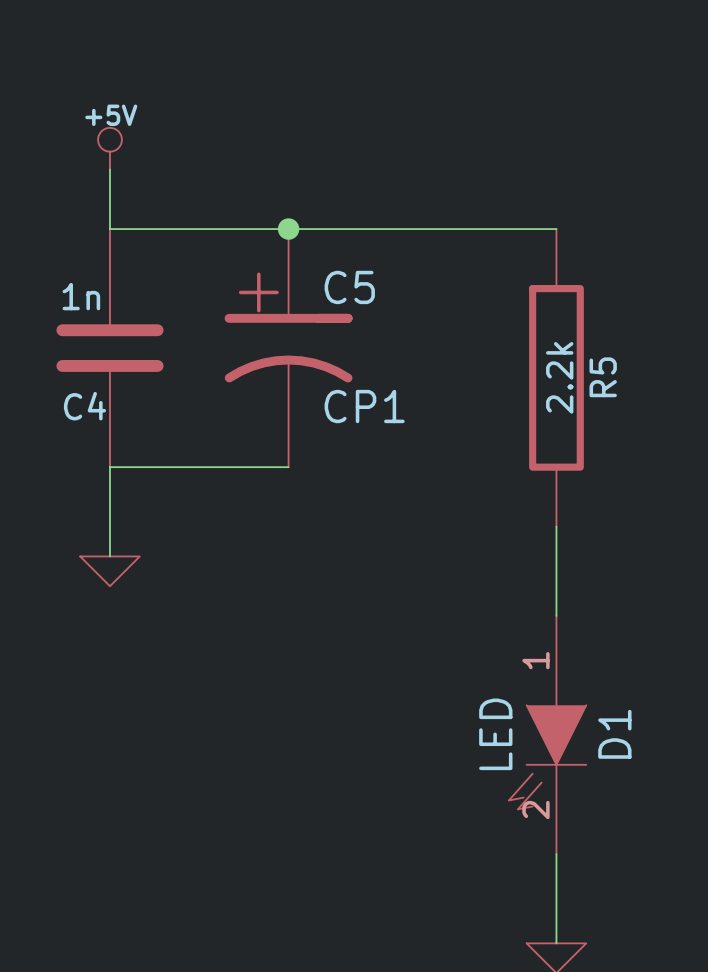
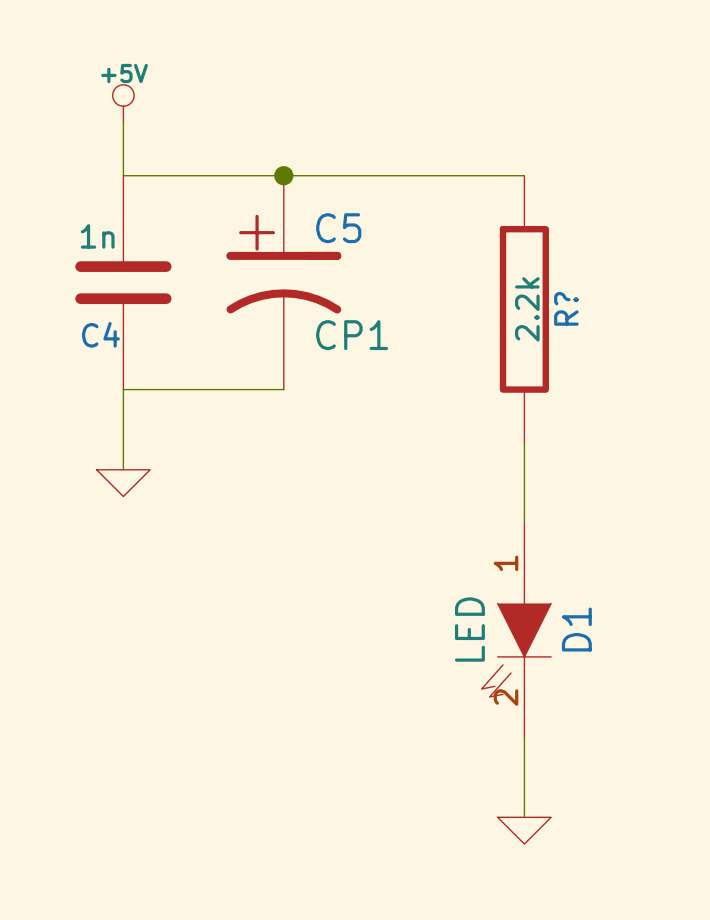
R5 name: R5 (603, 377) -> R? (566, 308)

